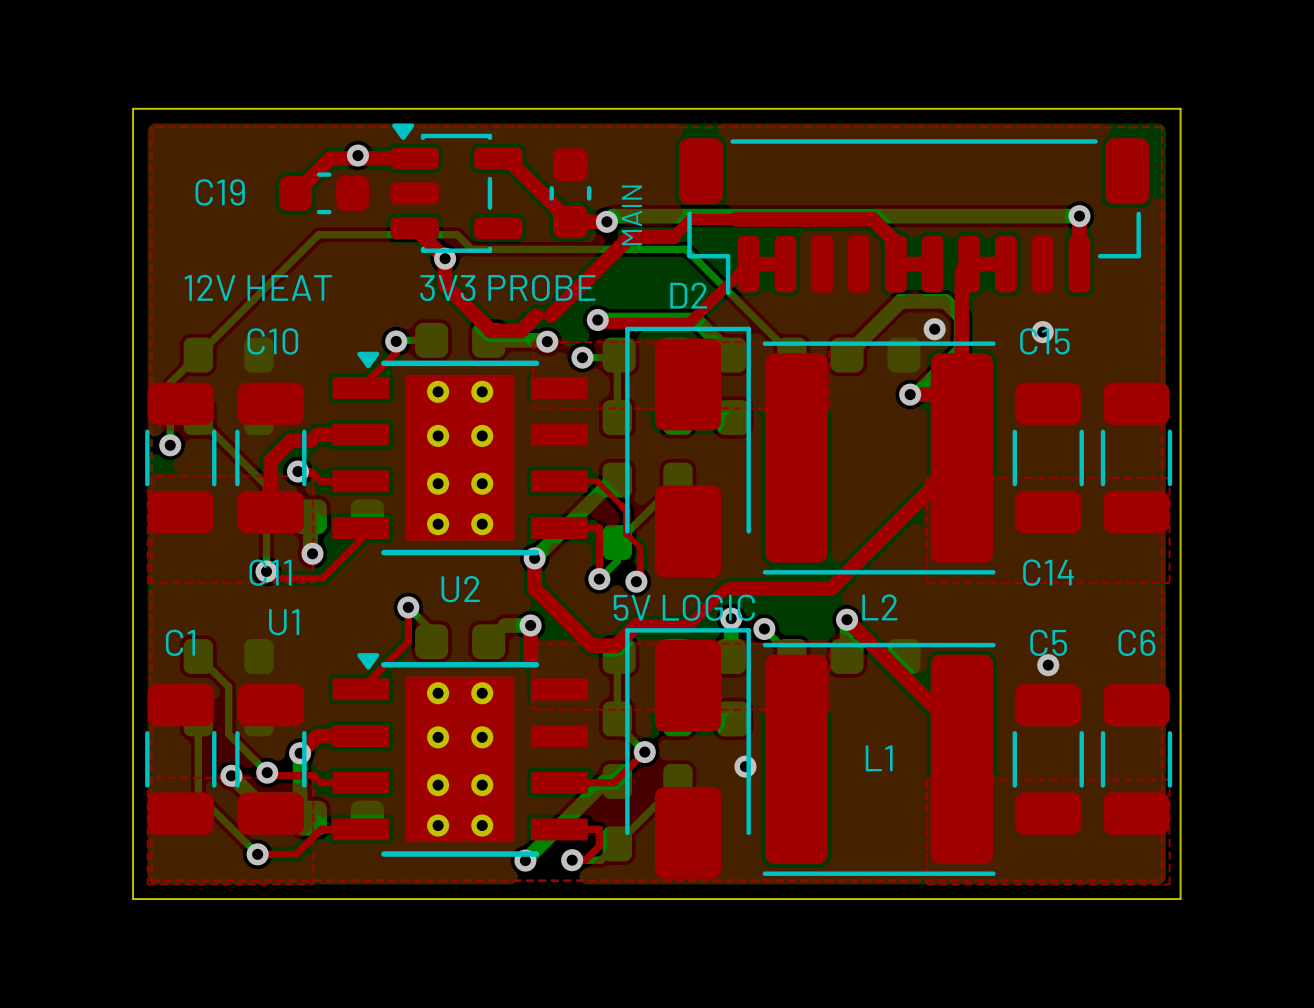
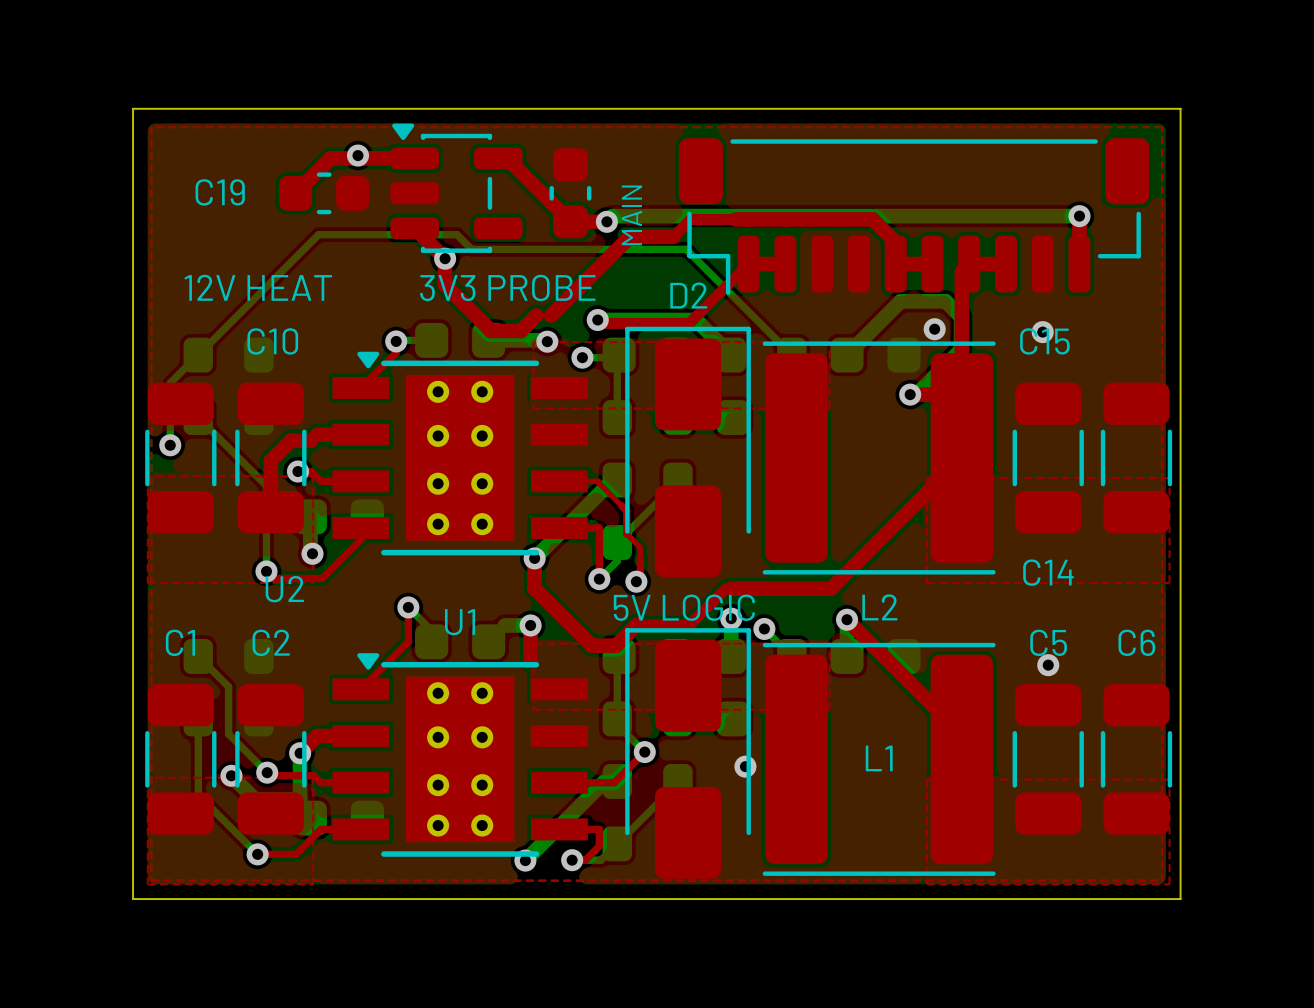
C11 name: C11 (270, 572) -> none
U2 name position: U2 (460, 589) -> U2 (284, 589)
U1 name position: U1 (284, 622) -> U1 (460, 622)
C2 name: none -> C2 (271, 642)

